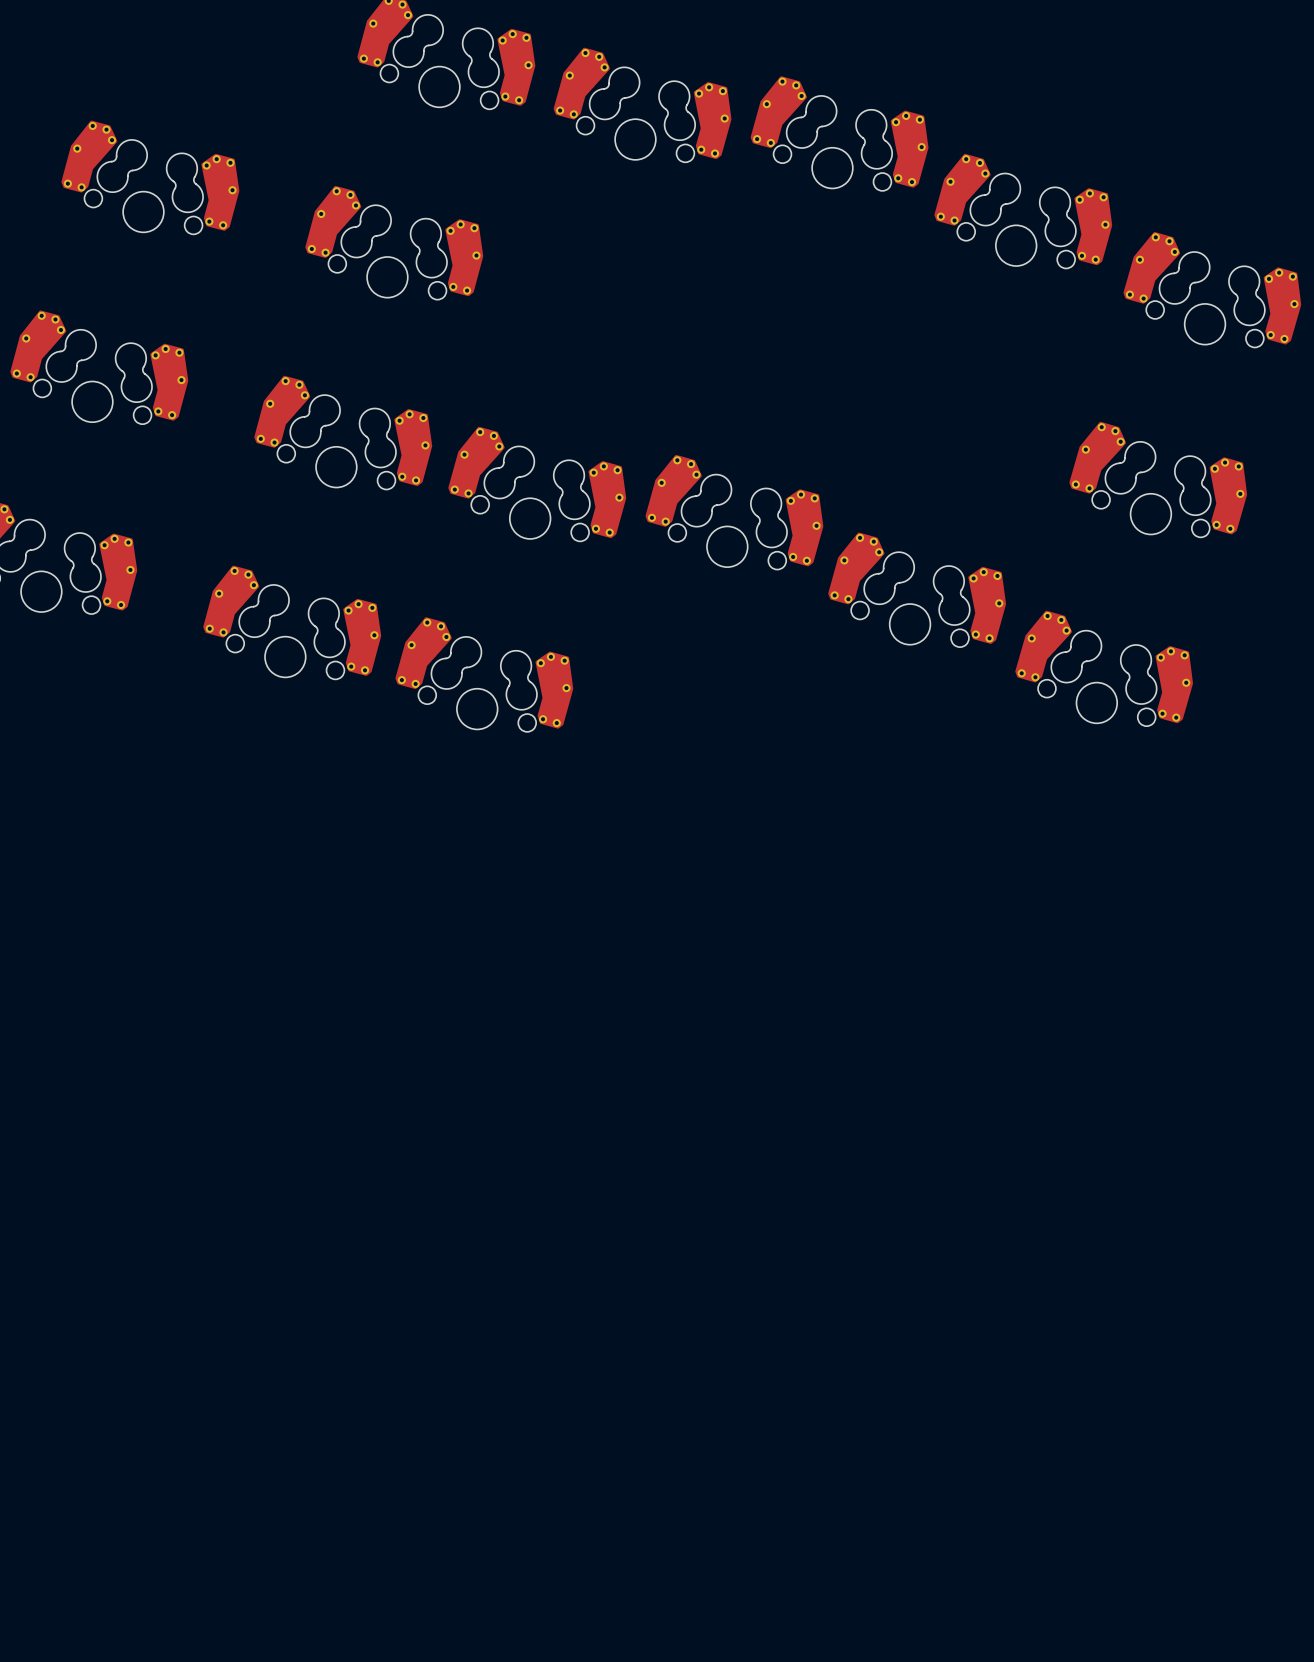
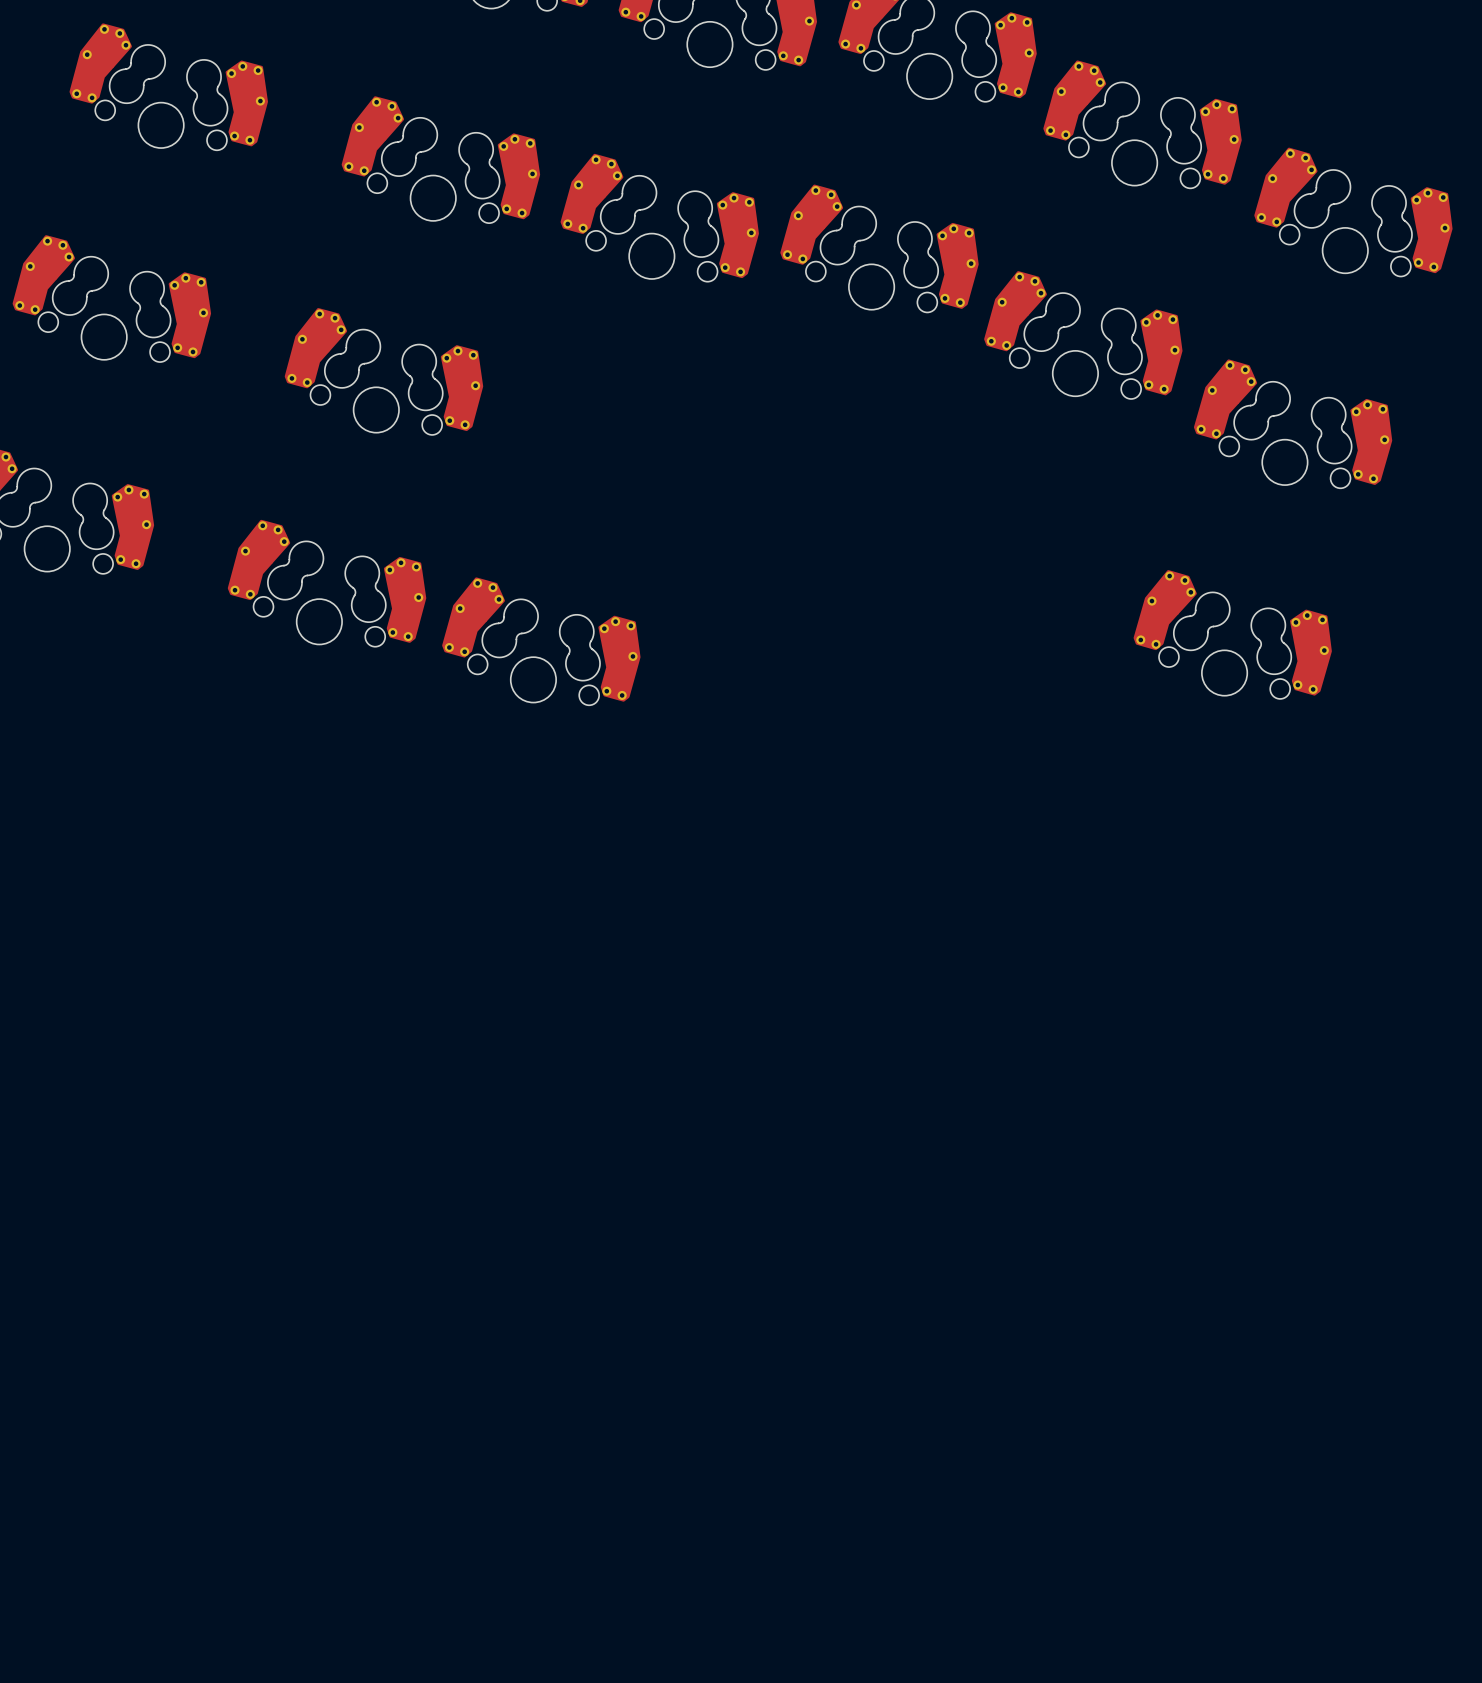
part: none -> (659, 217)
part: none -> (879, 248)
part: none -> (1083, 335)
part: (537, 484) -> none
part: (734, 512) -> none
part: (917, 589) -> none

